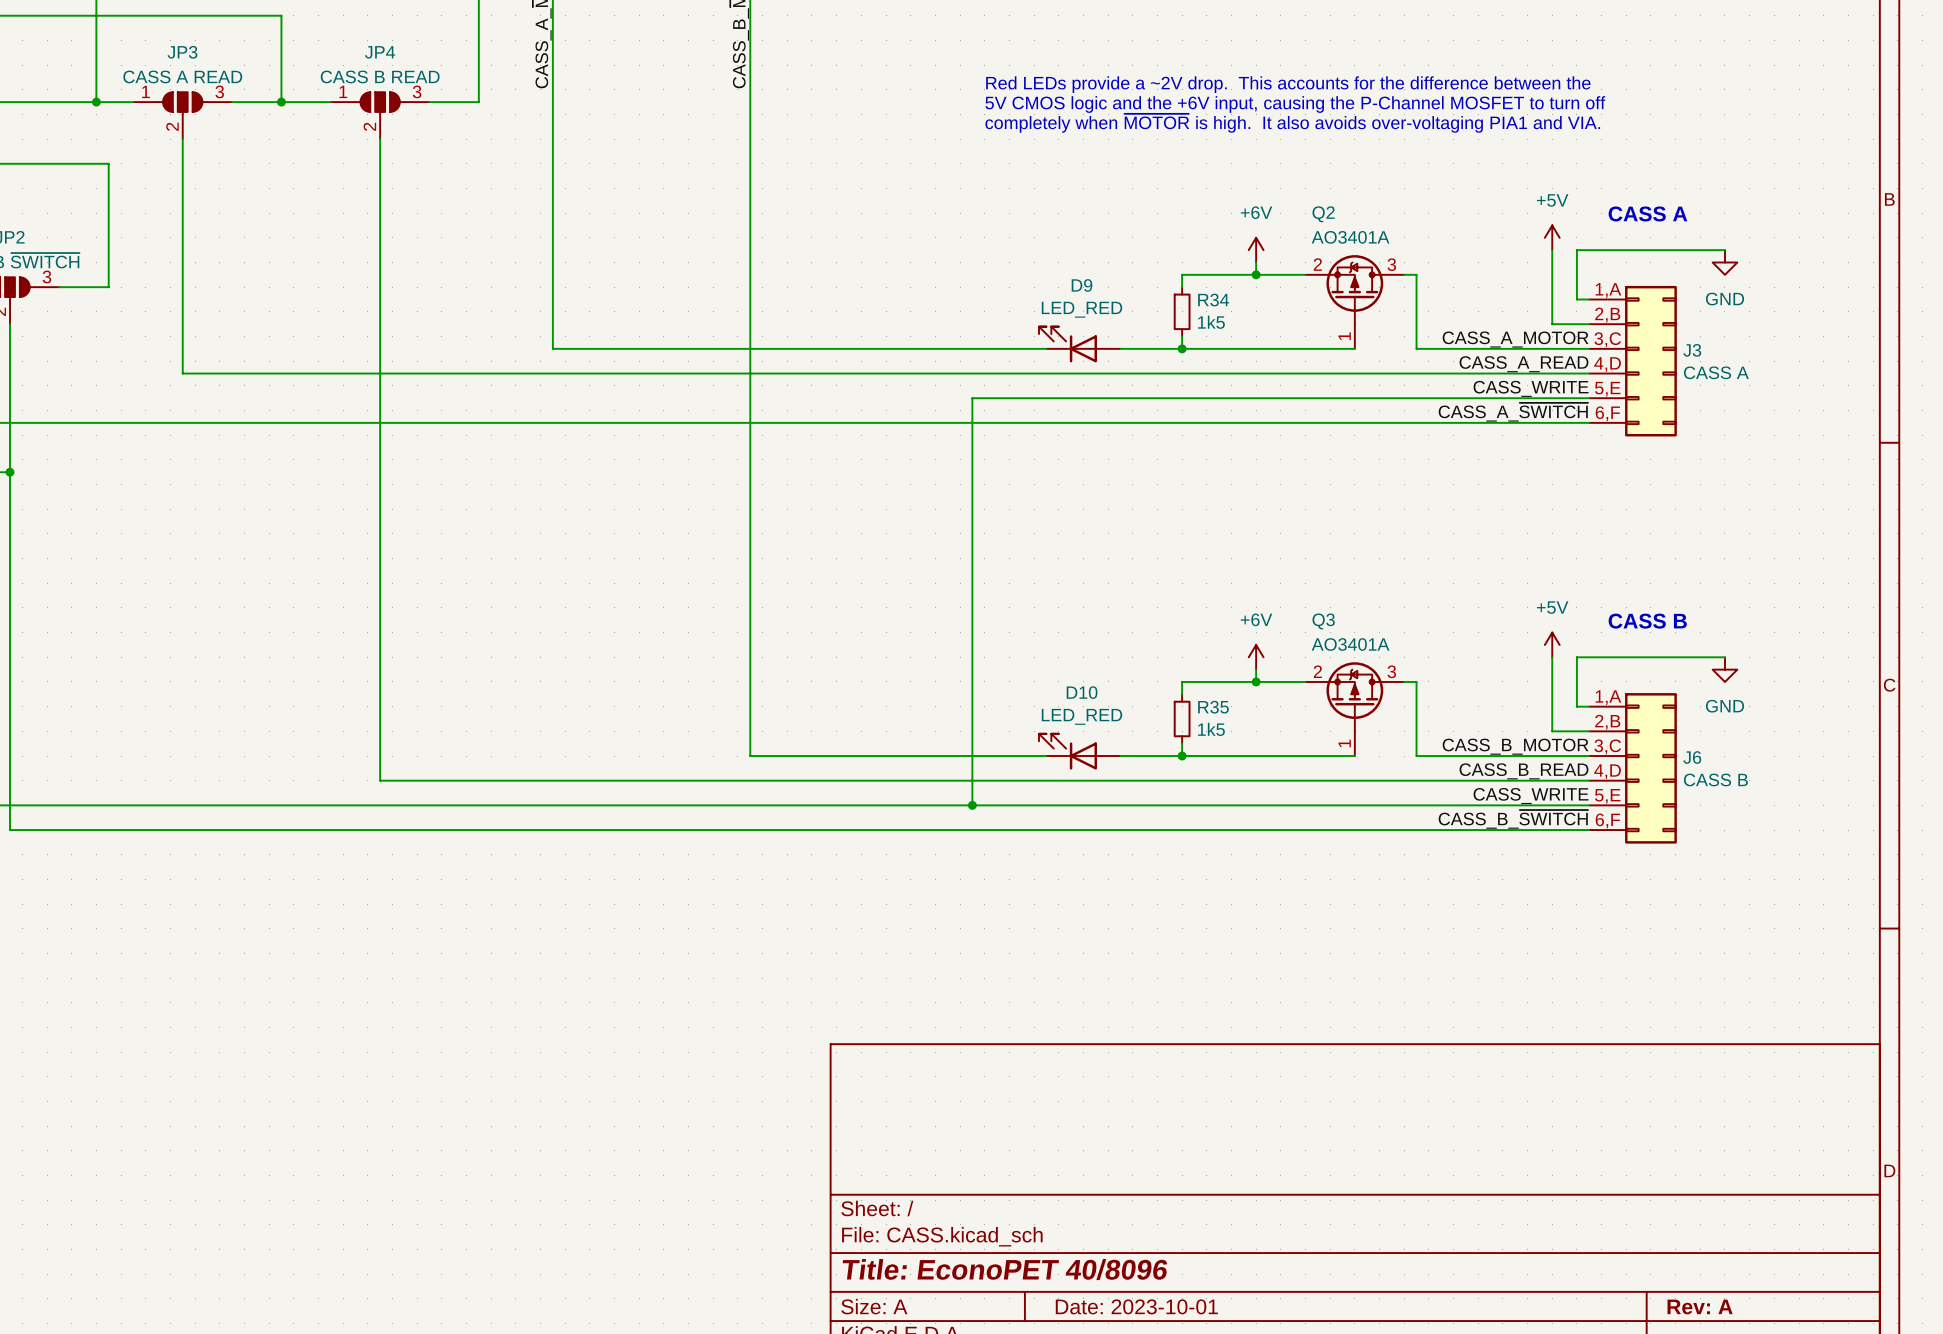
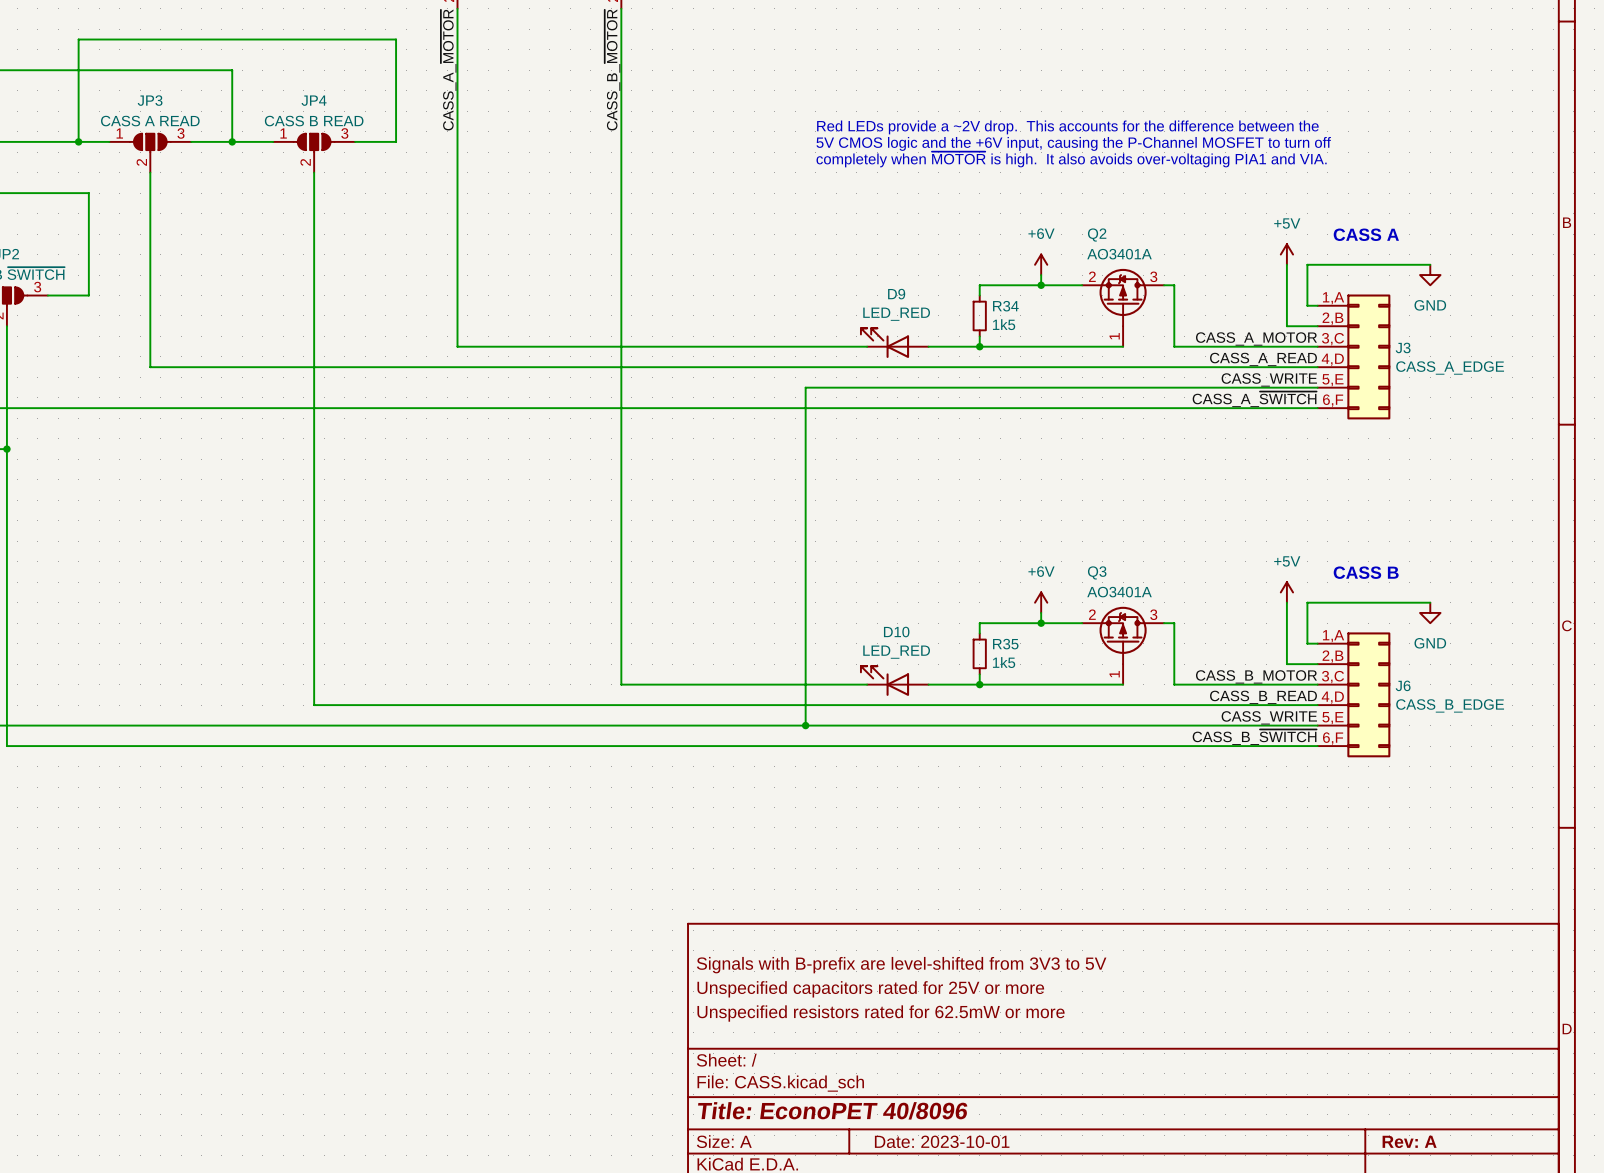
J3 value: CASS A (1716, 372) -> CASS_A_EDGE (1450, 368)
J6 value: CASS B (1715, 779) -> CASS_B_EDGE (1450, 705)
title block: none -> Signals with B-prefix are level-shifted from 3V3 to 5V (901, 965)
title block: none -> Unspecified capacitors rated for 25V or more (870, 989)
title block: none -> Unspecified resistors rated for 62.5mW or more (881, 1013)

